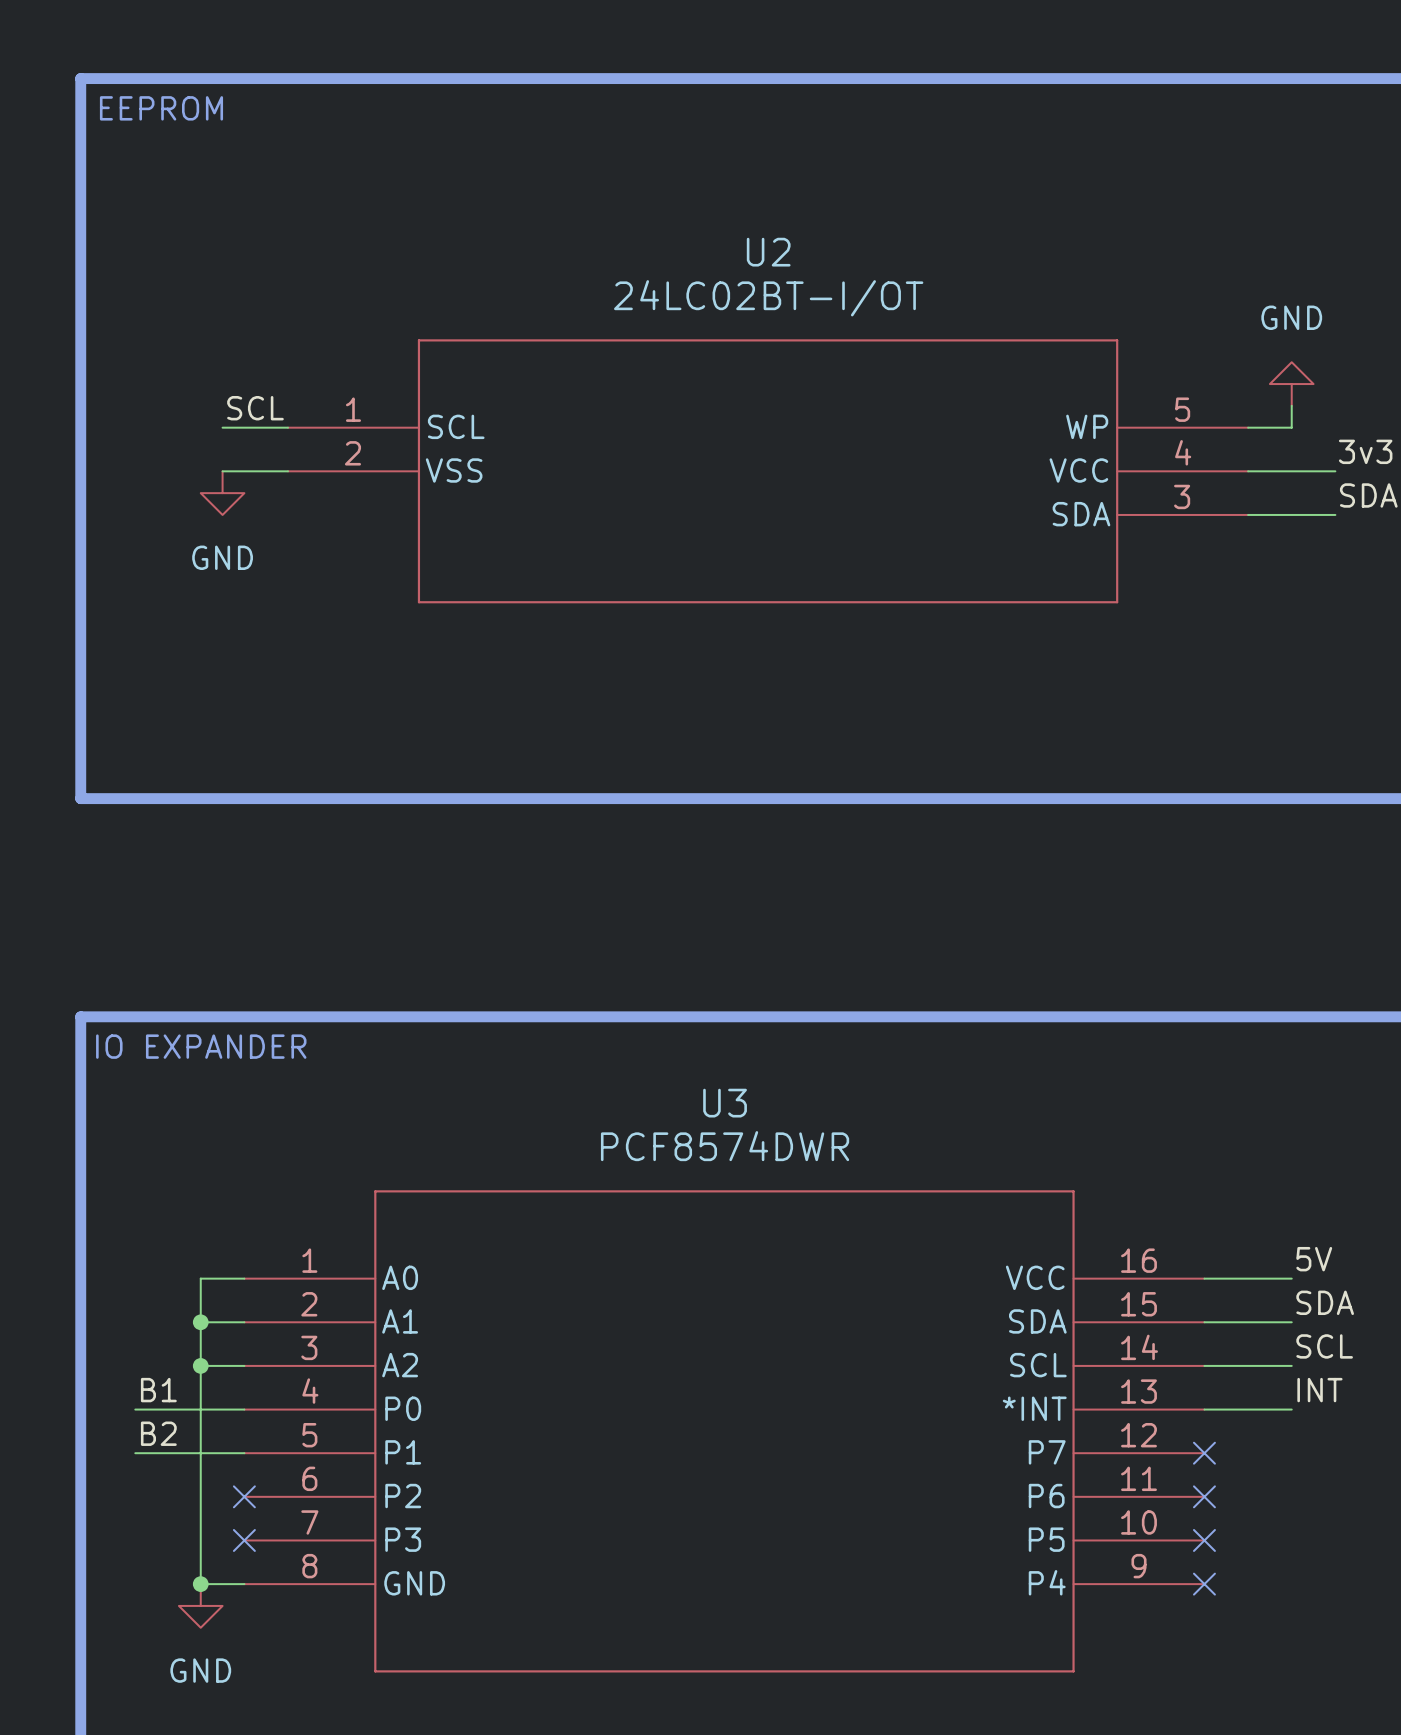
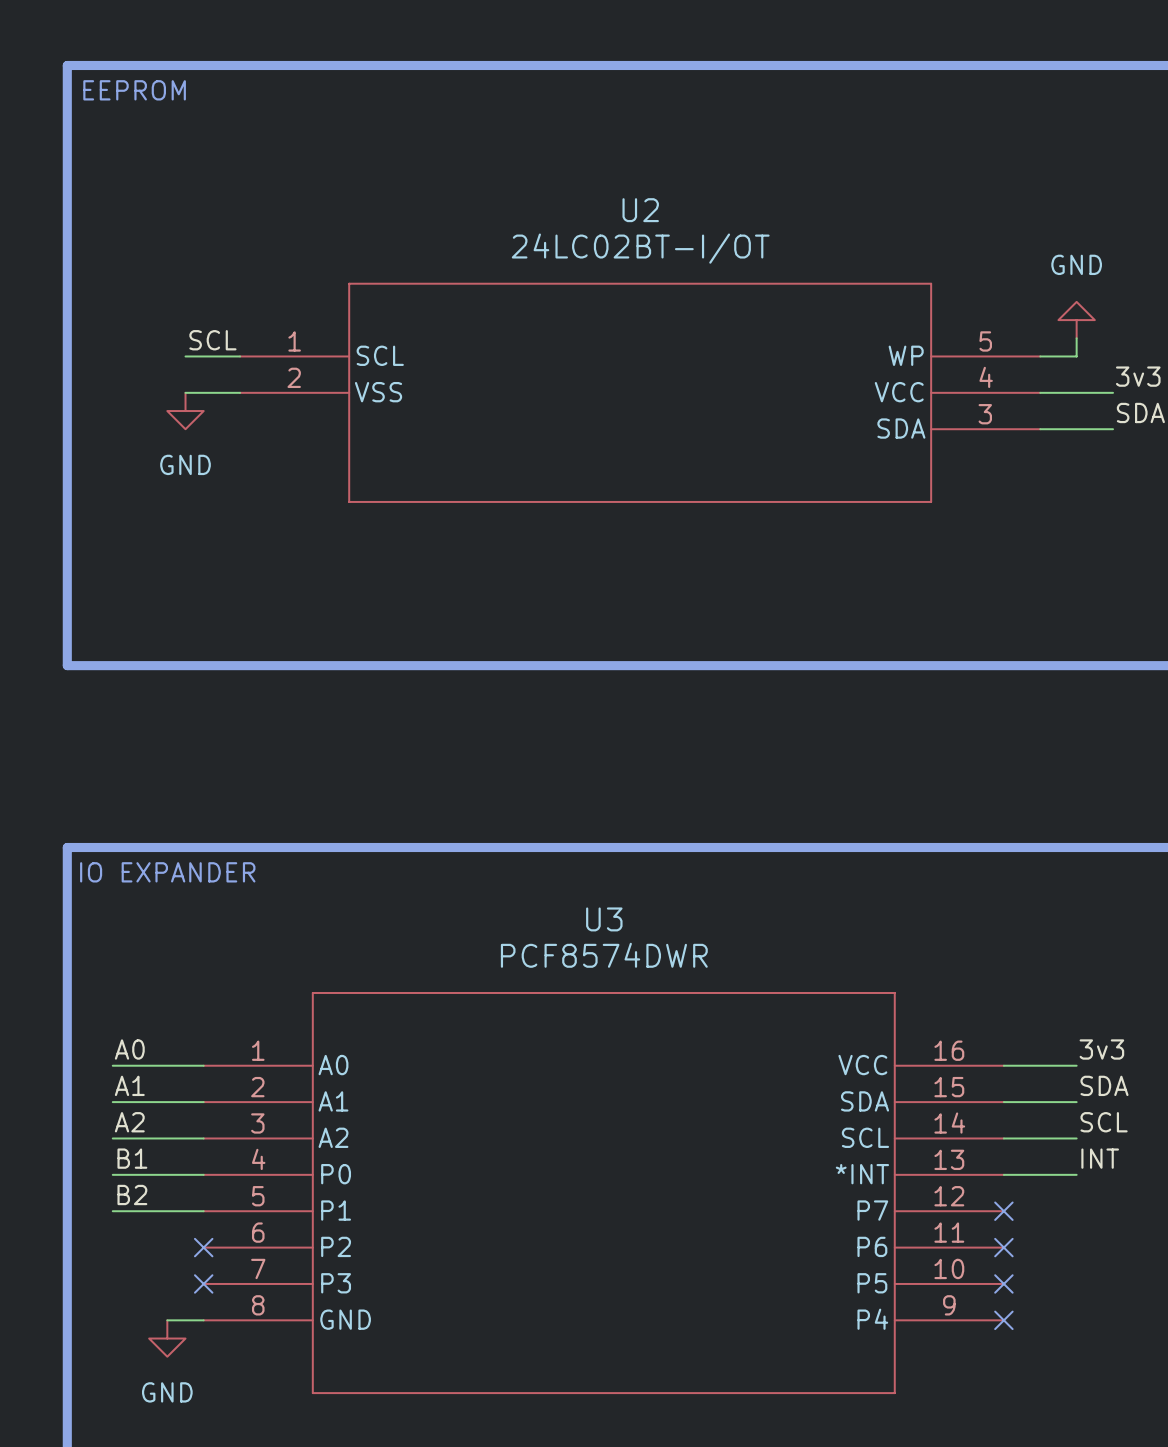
label: none -> A0 (129, 1049)
label: 5V (1314, 1259) -> 3v3 (1101, 1049)
wire: (200, 1278) (200, 1584) -> (167, 1065) (112, 1065)
label: none -> A1 (129, 1085)
wire: none -> (112, 1102) (167, 1102)
junction: (200, 1322) -> none
label: none -> A2 (129, 1122)
wire: none -> (112, 1138) (167, 1138)
junction: (200, 1365) -> none
junction: (200, 1584) -> none

